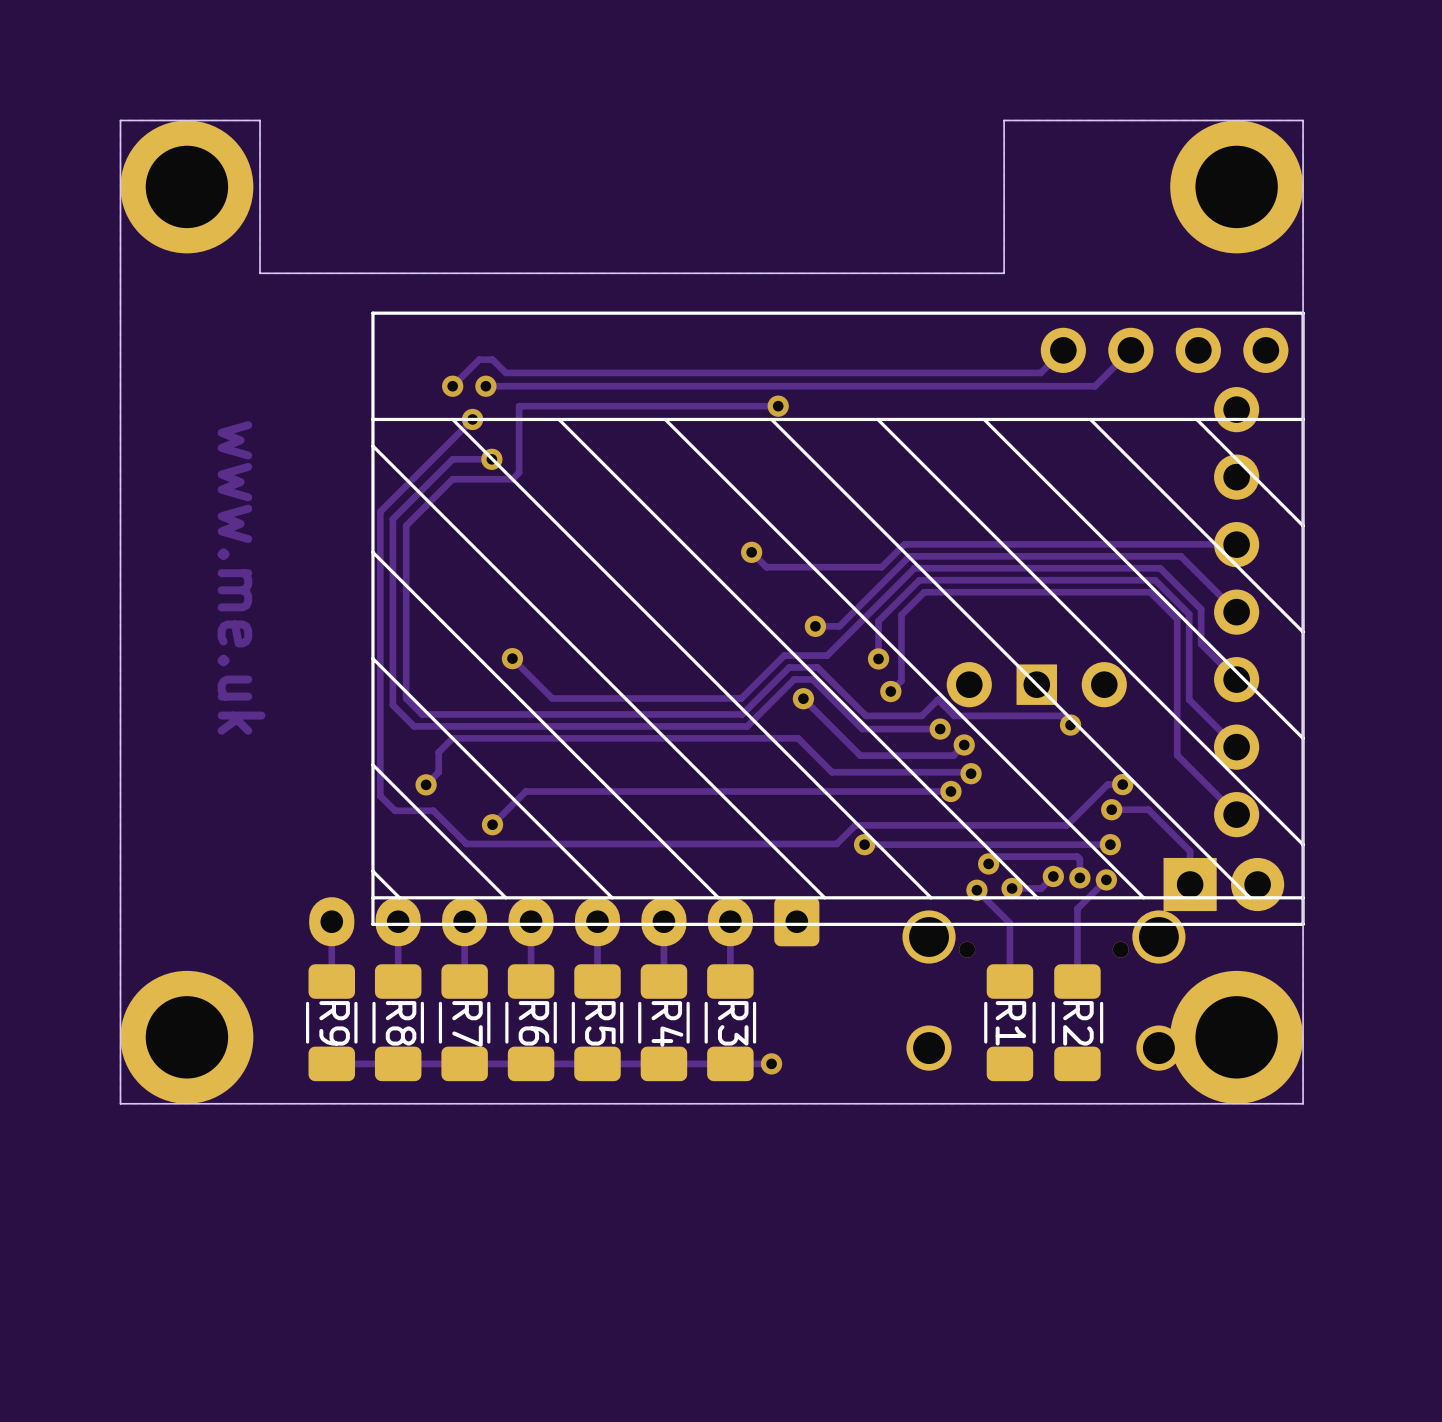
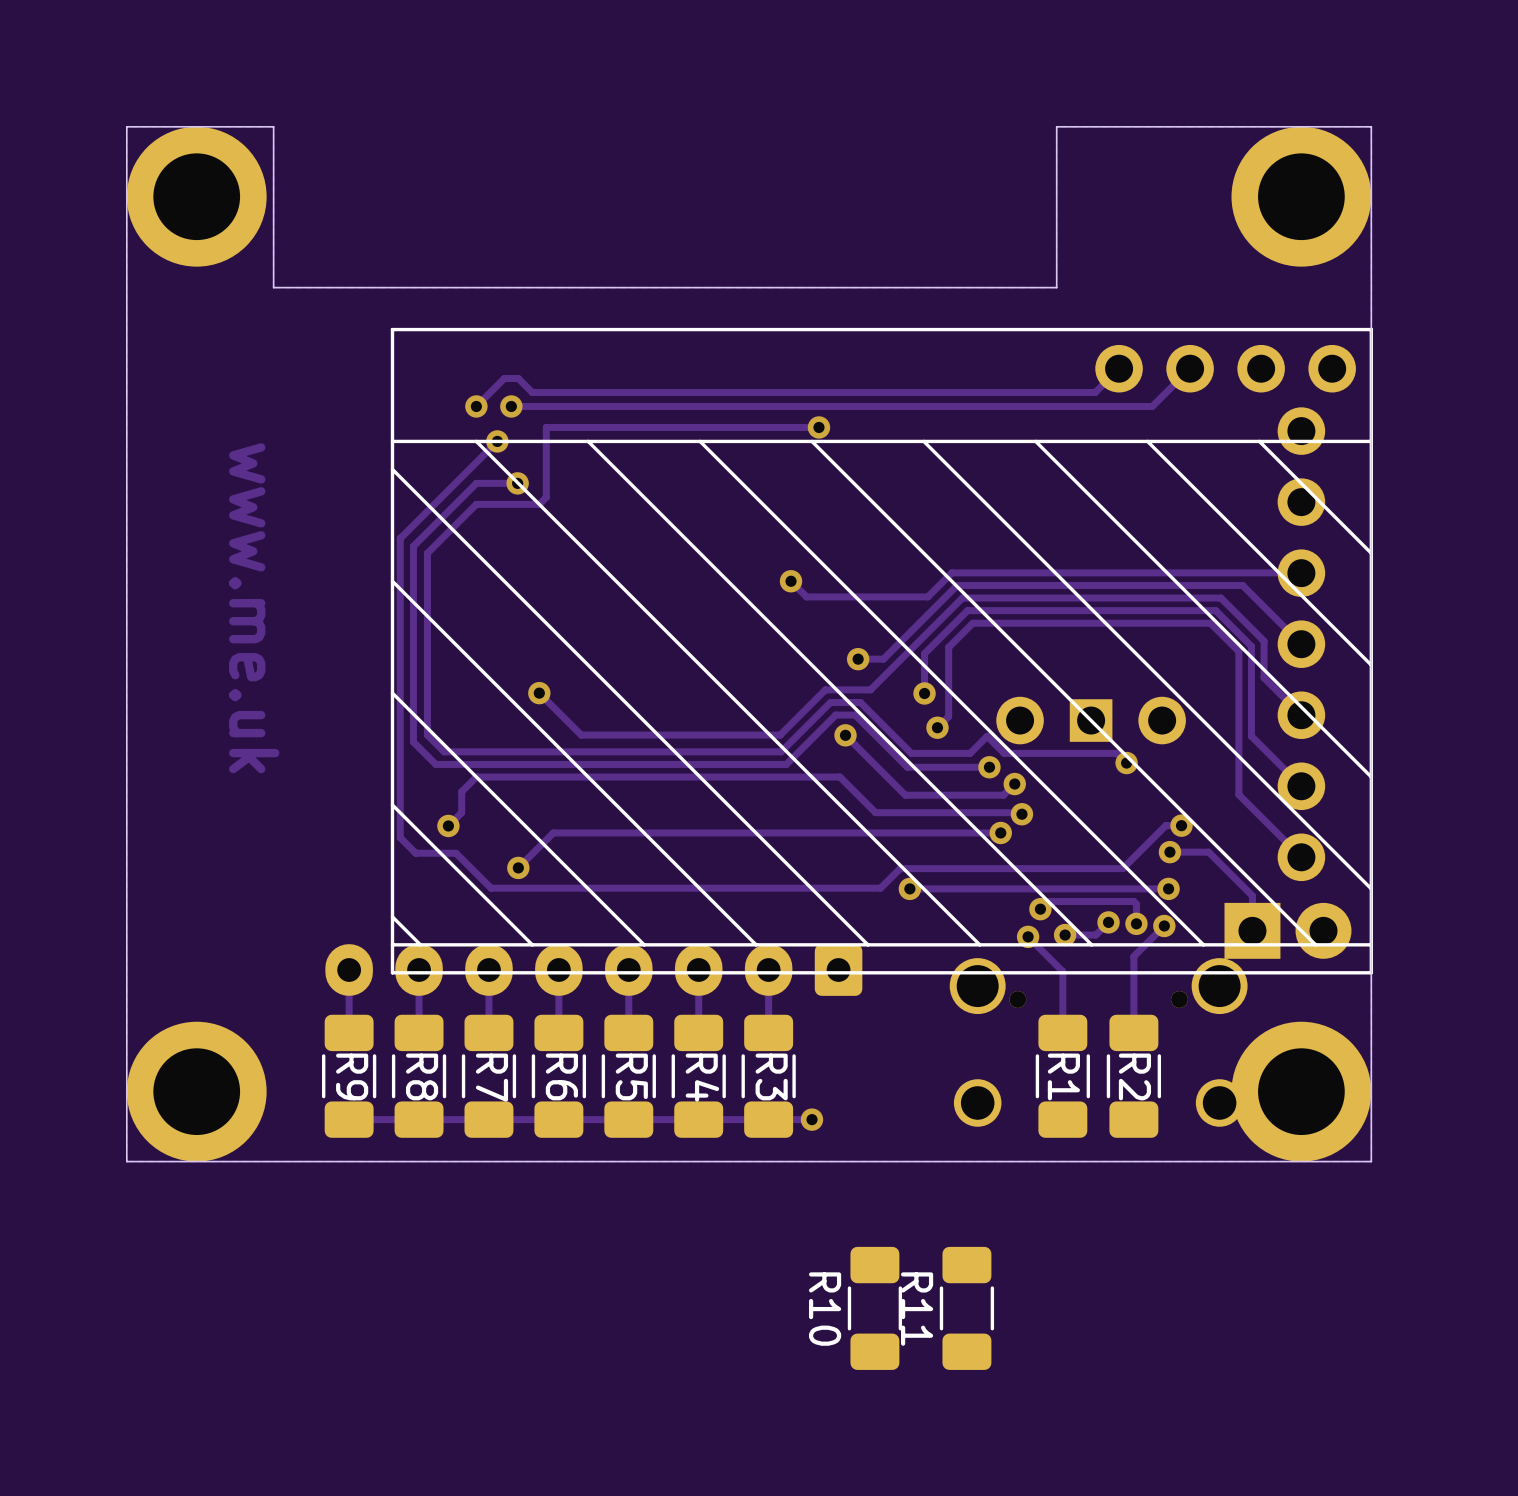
R10: none -> (874, 1308)
R11: none -> (966, 1308)

